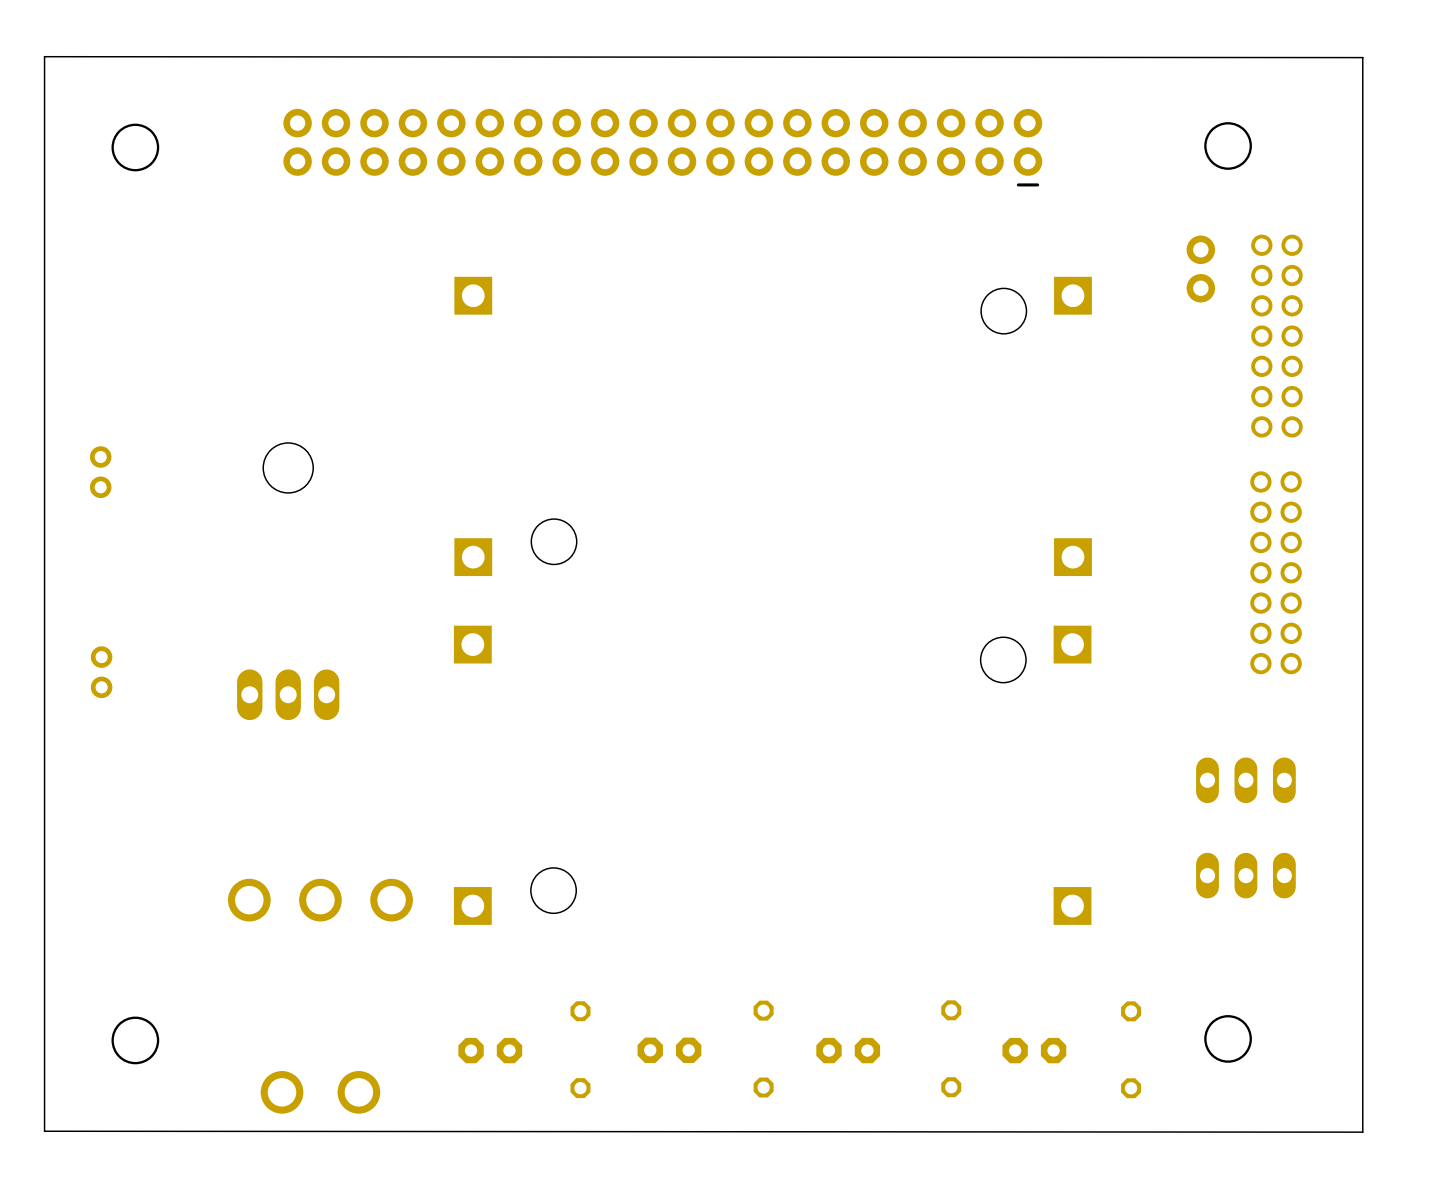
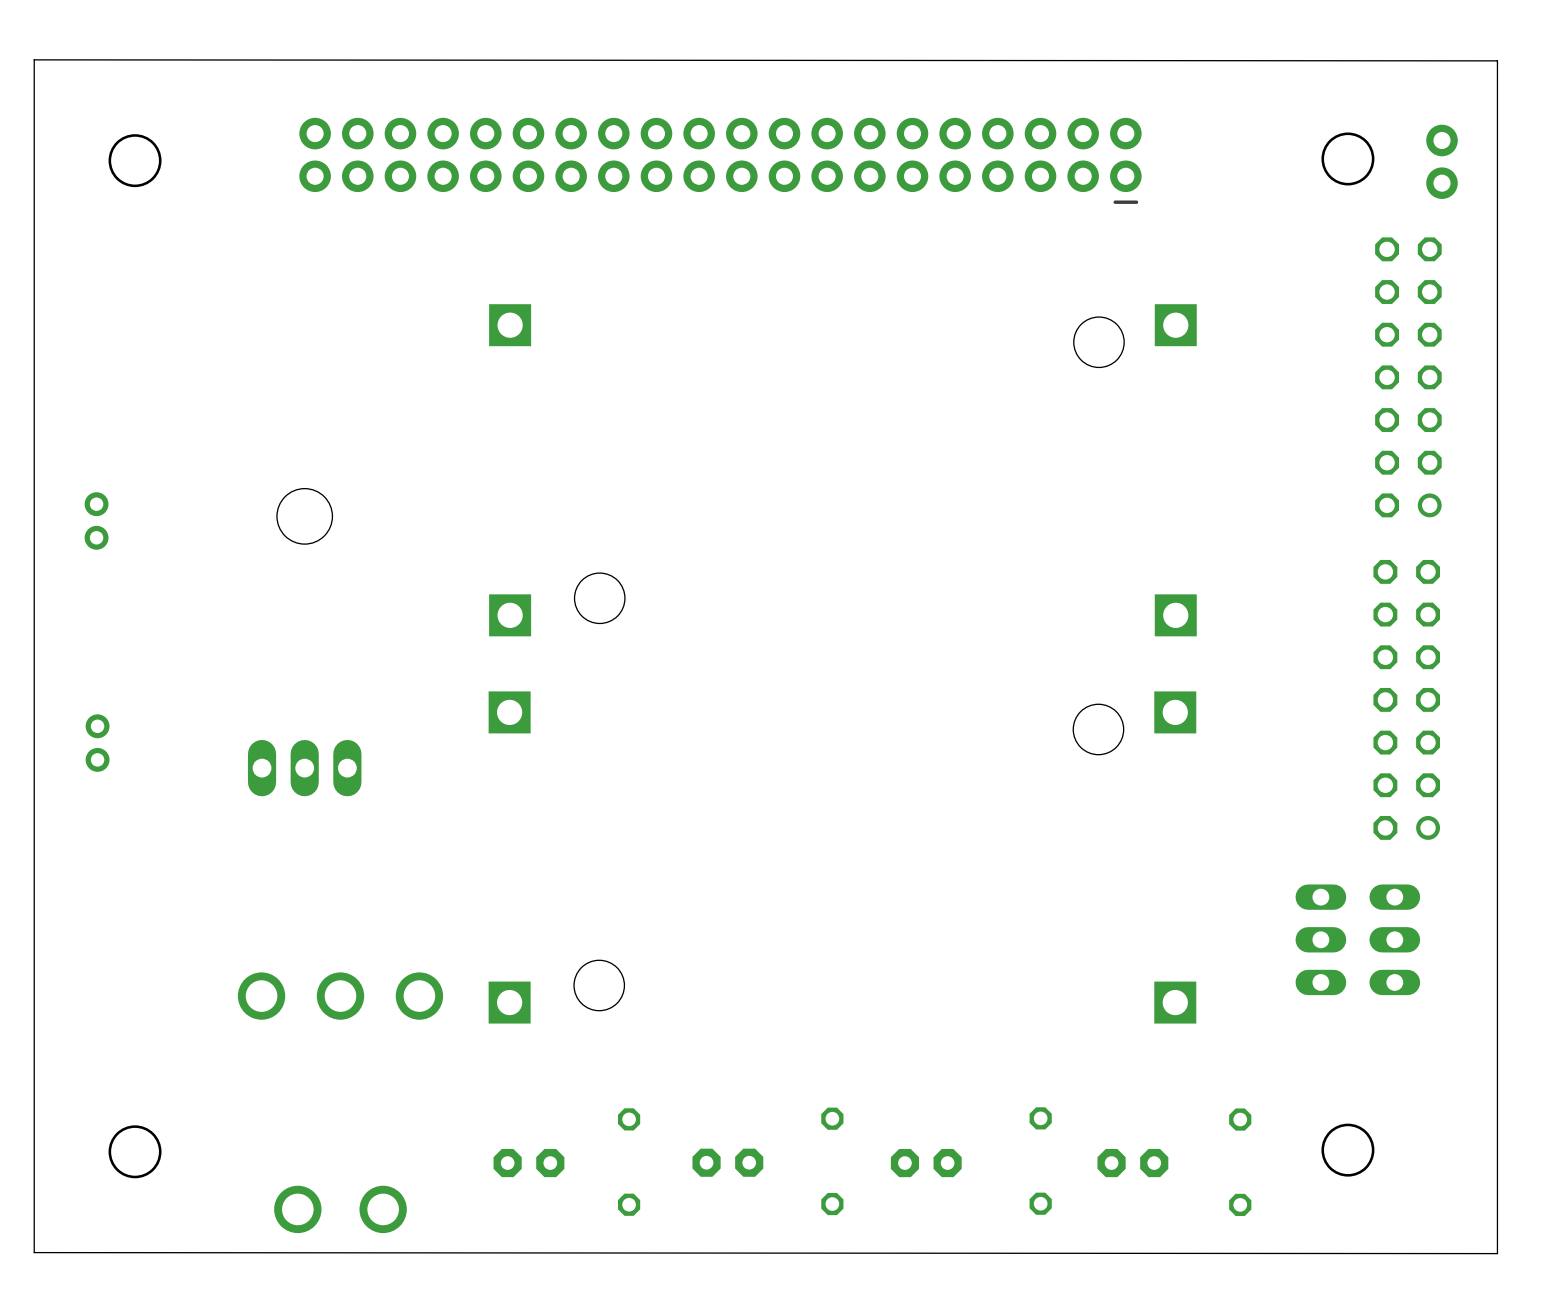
part footprint: [1251, 234, 1303, 438] -> [1375, 237, 1442, 518]
part position: (1200, 269) -> (1442, 161)
part: (1276, 572) -> none
part: none -> (1406, 699)
part: (1245, 780) -> none
part: none -> (1320, 939)
part: none -> (1394, 939)
part: (1245, 875) -> none

